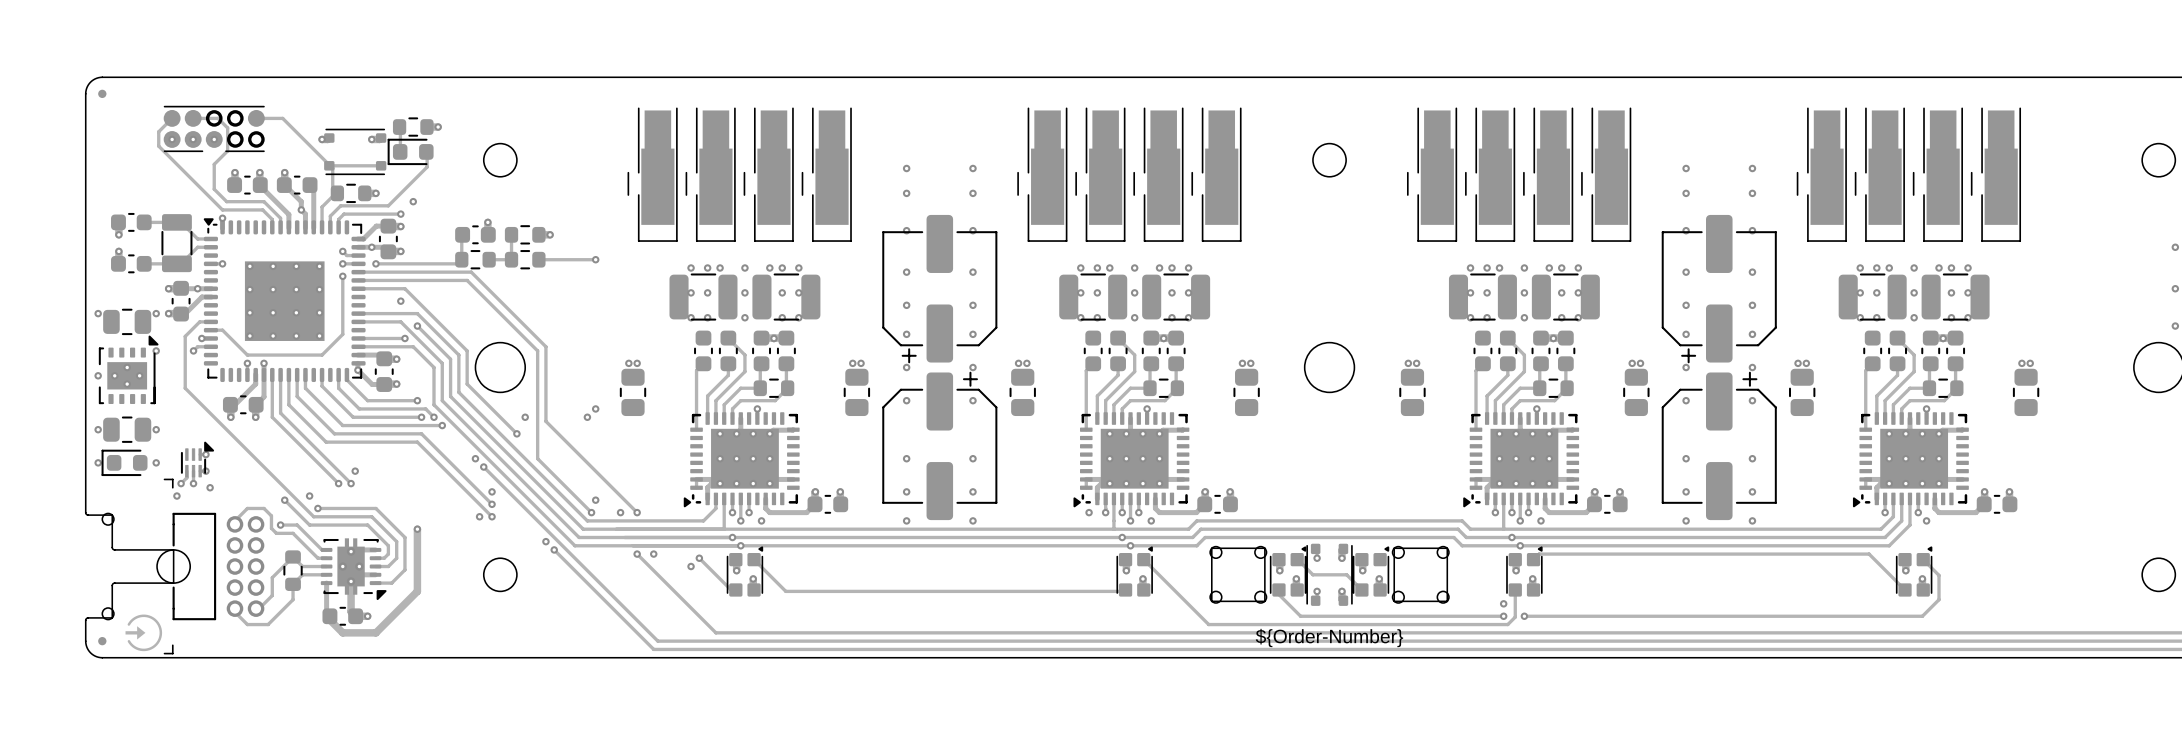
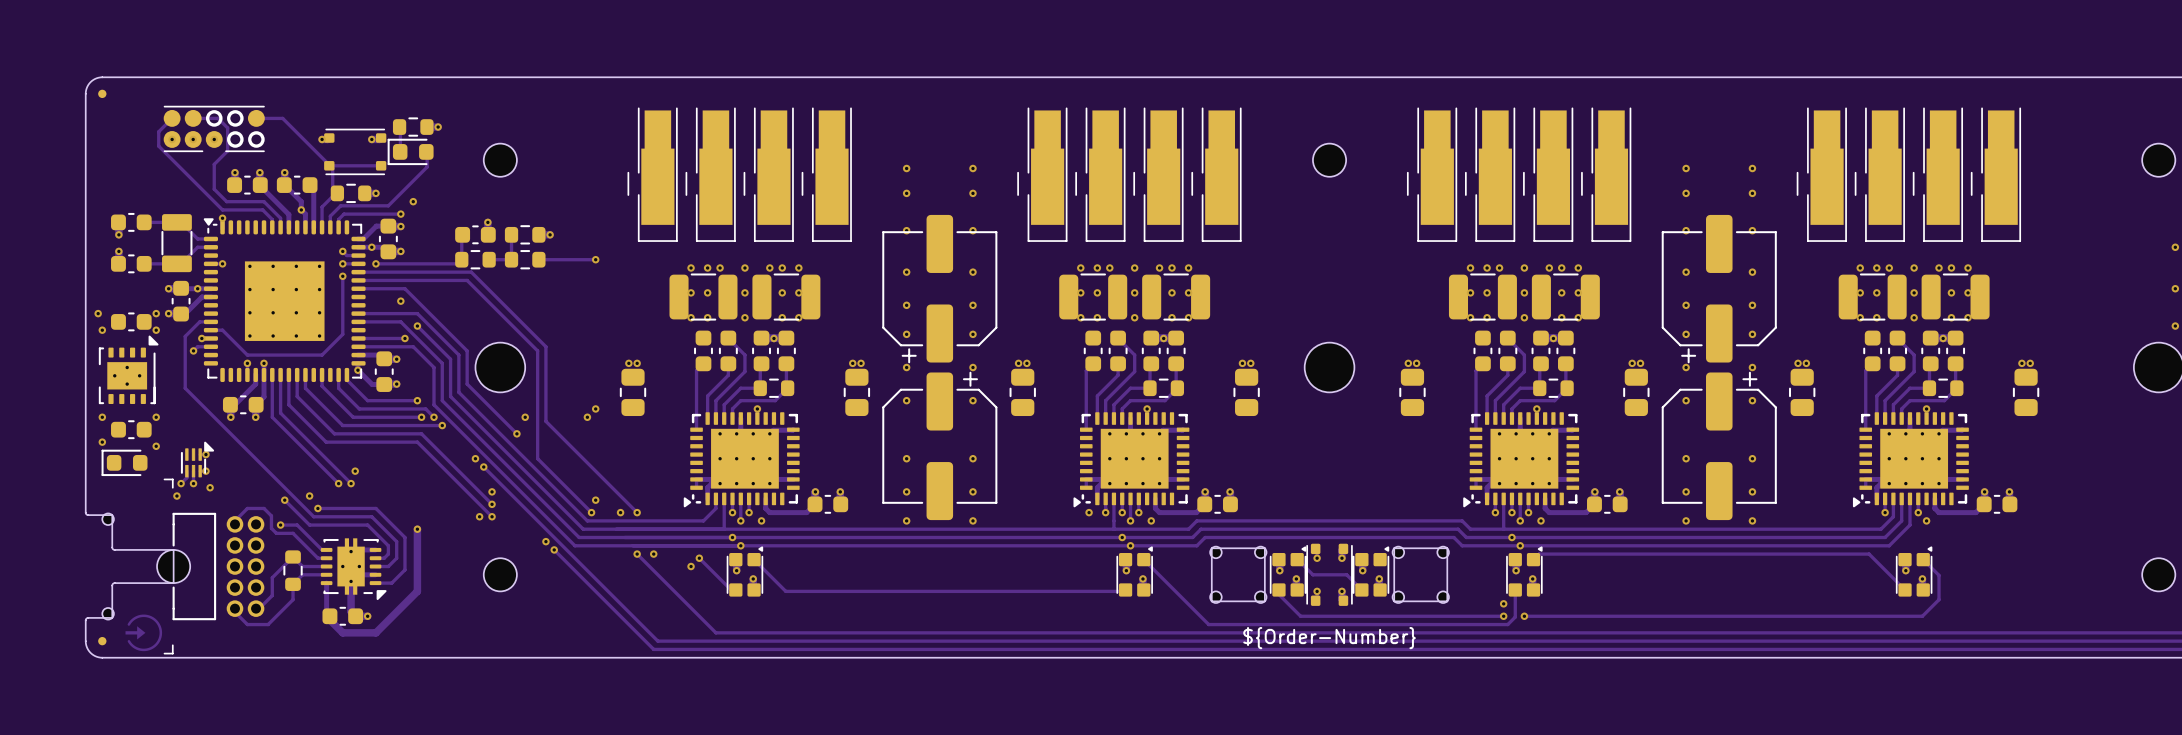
part footprint: [103, 308, 152, 336] -> [111, 312, 152, 332]
via: none -> (102, 330)
via position: (156, 350) -> (156, 330)
via: (98, 375) -> none
part footprint: [103, 416, 152, 443] -> [111, 420, 152, 440]
via: none -> (102, 417)
via: none -> (156, 417)
via: (98, 429) -> none
via: (156, 429) -> none
via: none -> (102, 442)
via: none -> (156, 446)
via: (98, 462) -> none
via: (156, 462) -> none

